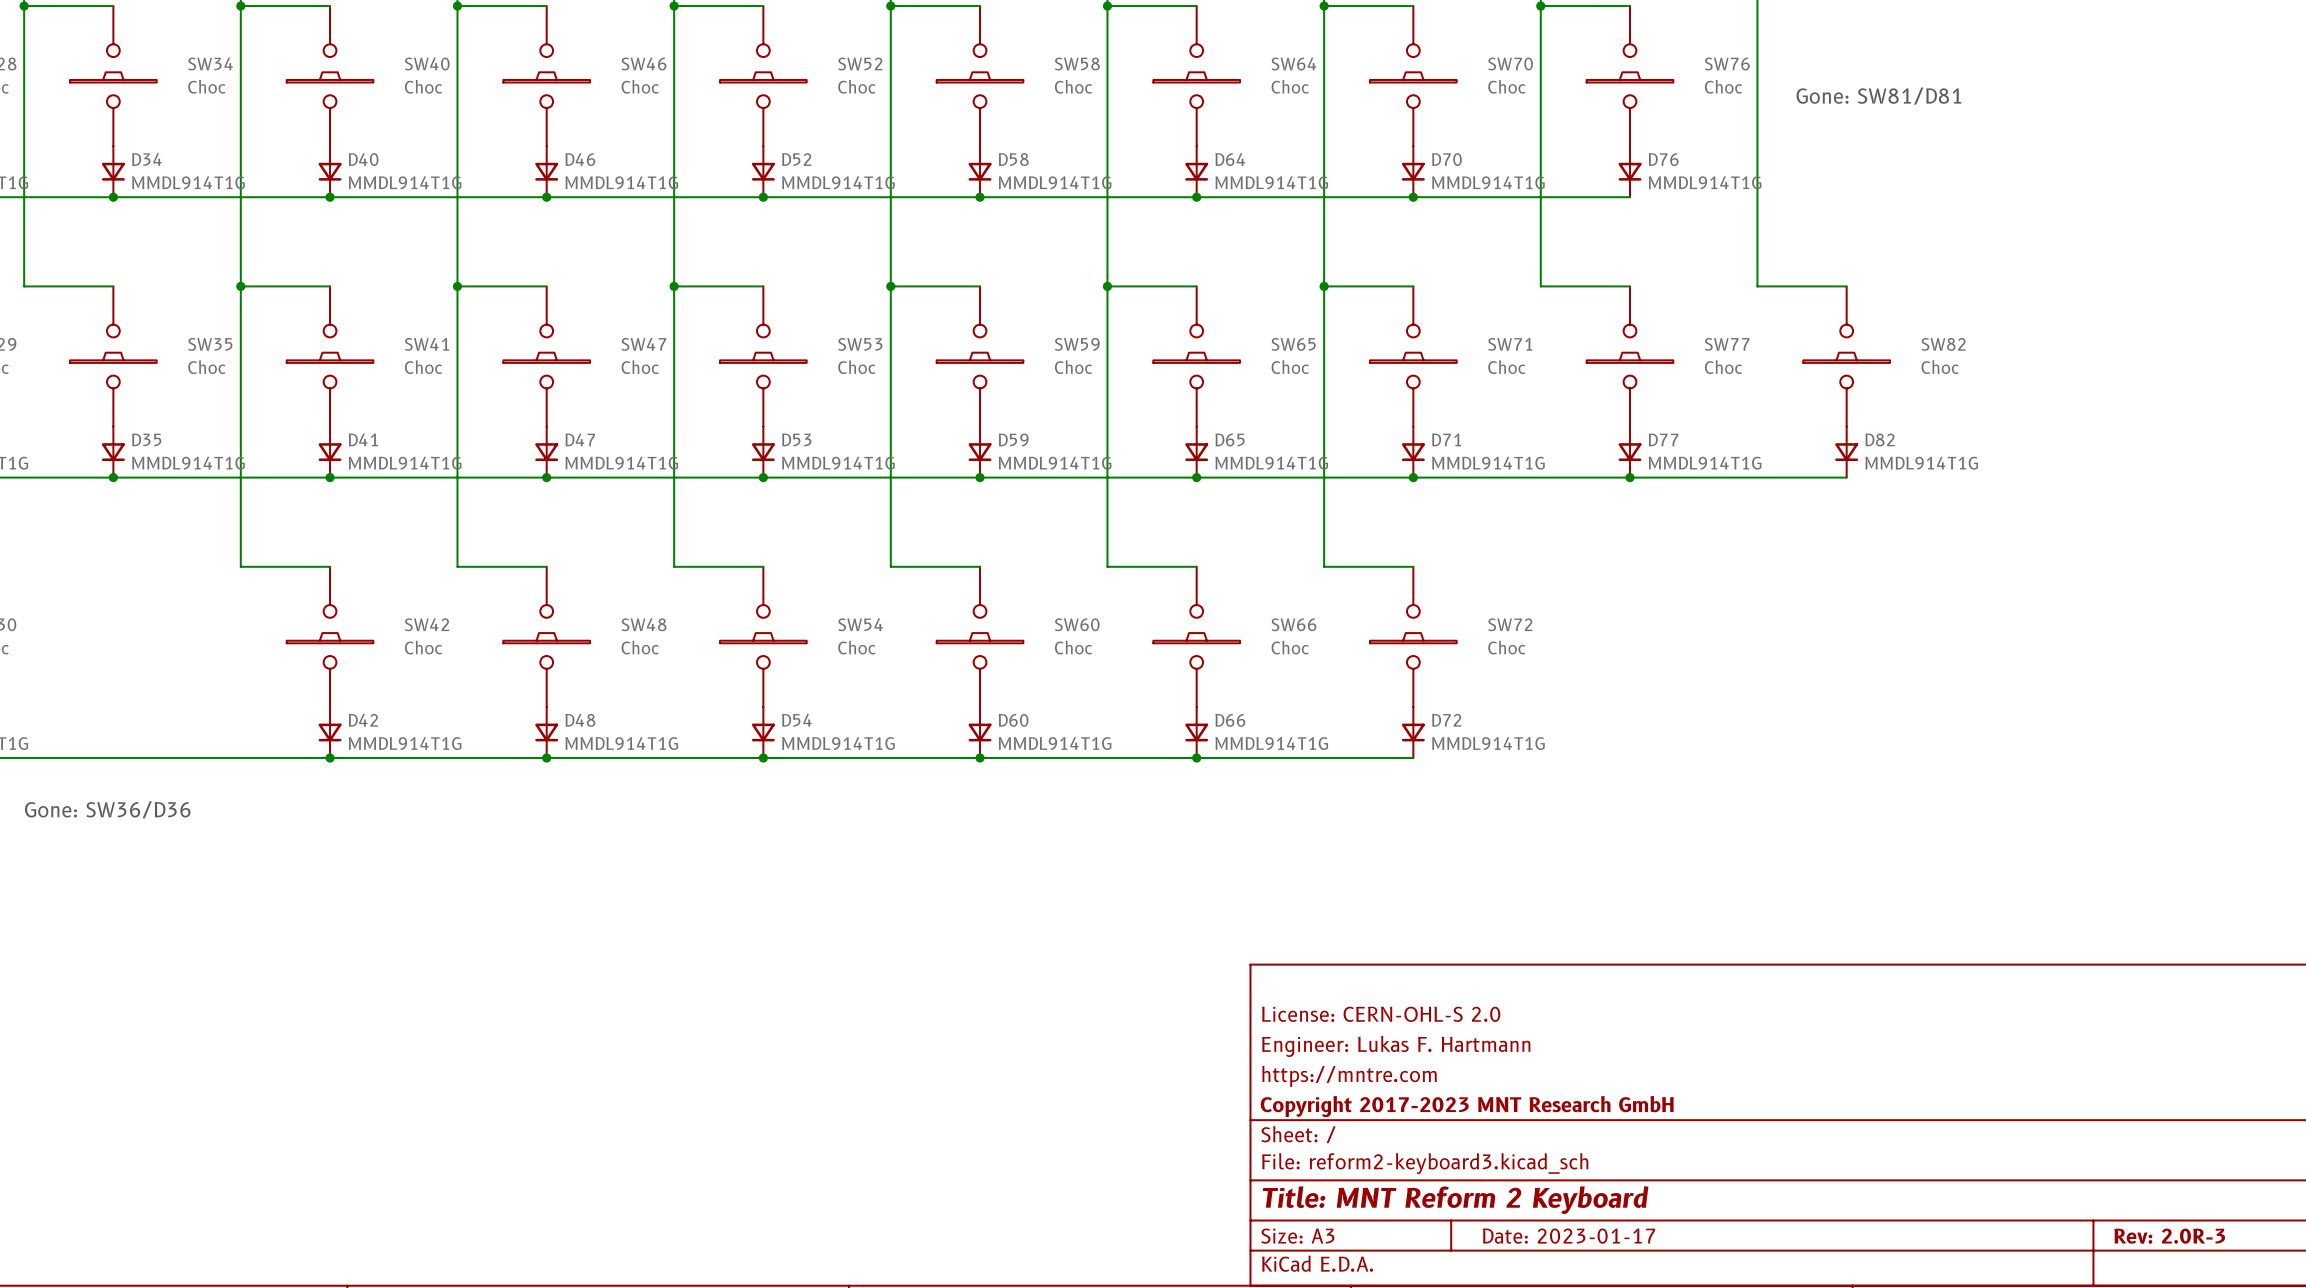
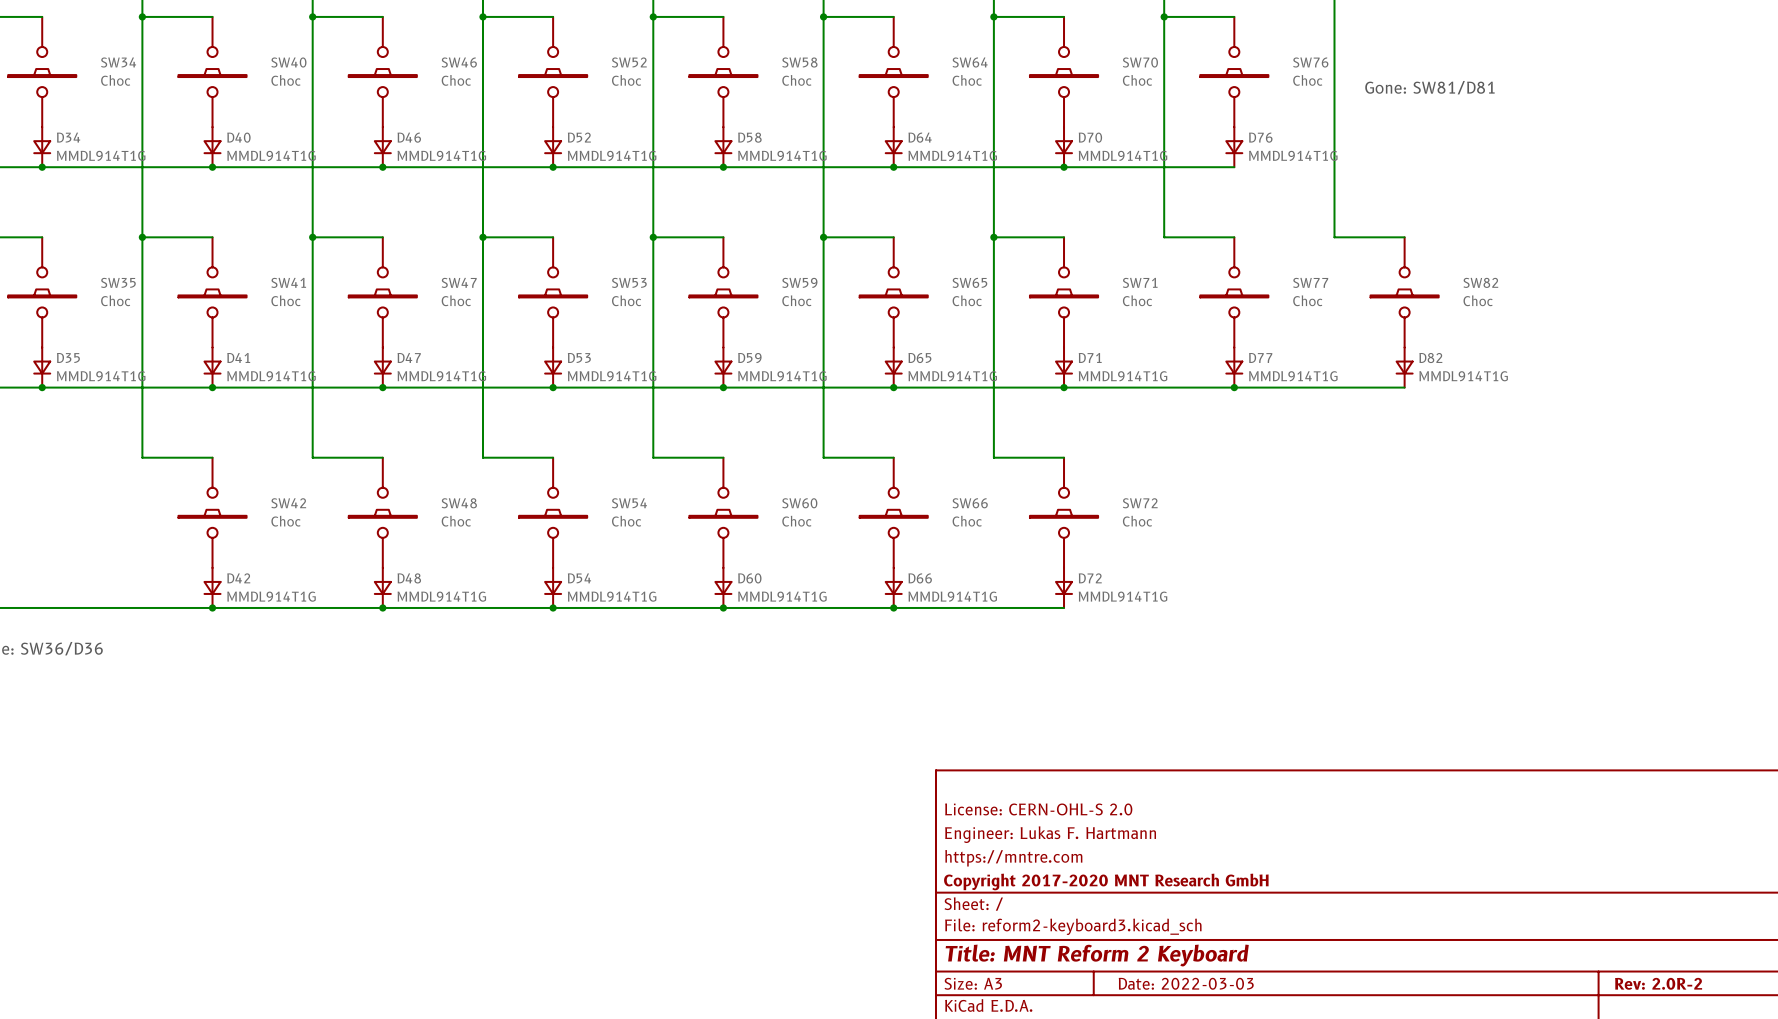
title block: Copyright 2017-2023 MNT Research GmbH (1467, 1106) -> Copyright 2017-2020 MNT Research GmbH (1106, 881)
title block: Date: 2023-01-17 (1569, 1236) -> Date: 2022-03-03 (1186, 983)
title block: Rev: 2.0R-3 (2169, 1236) -> Rev: 2.0R-2 (1658, 983)

